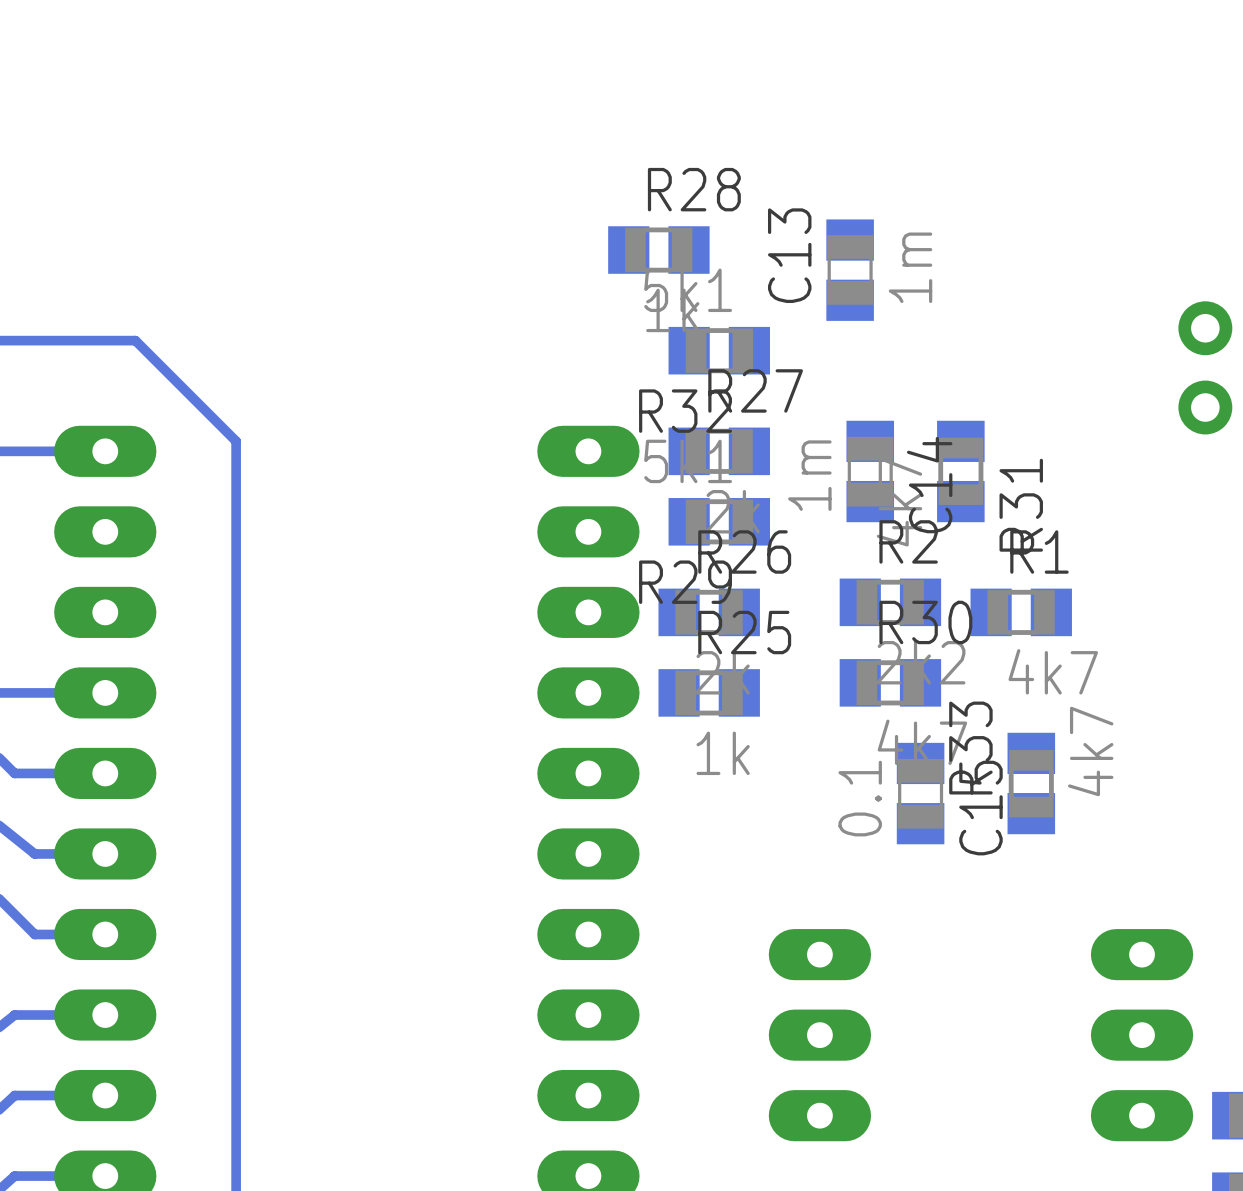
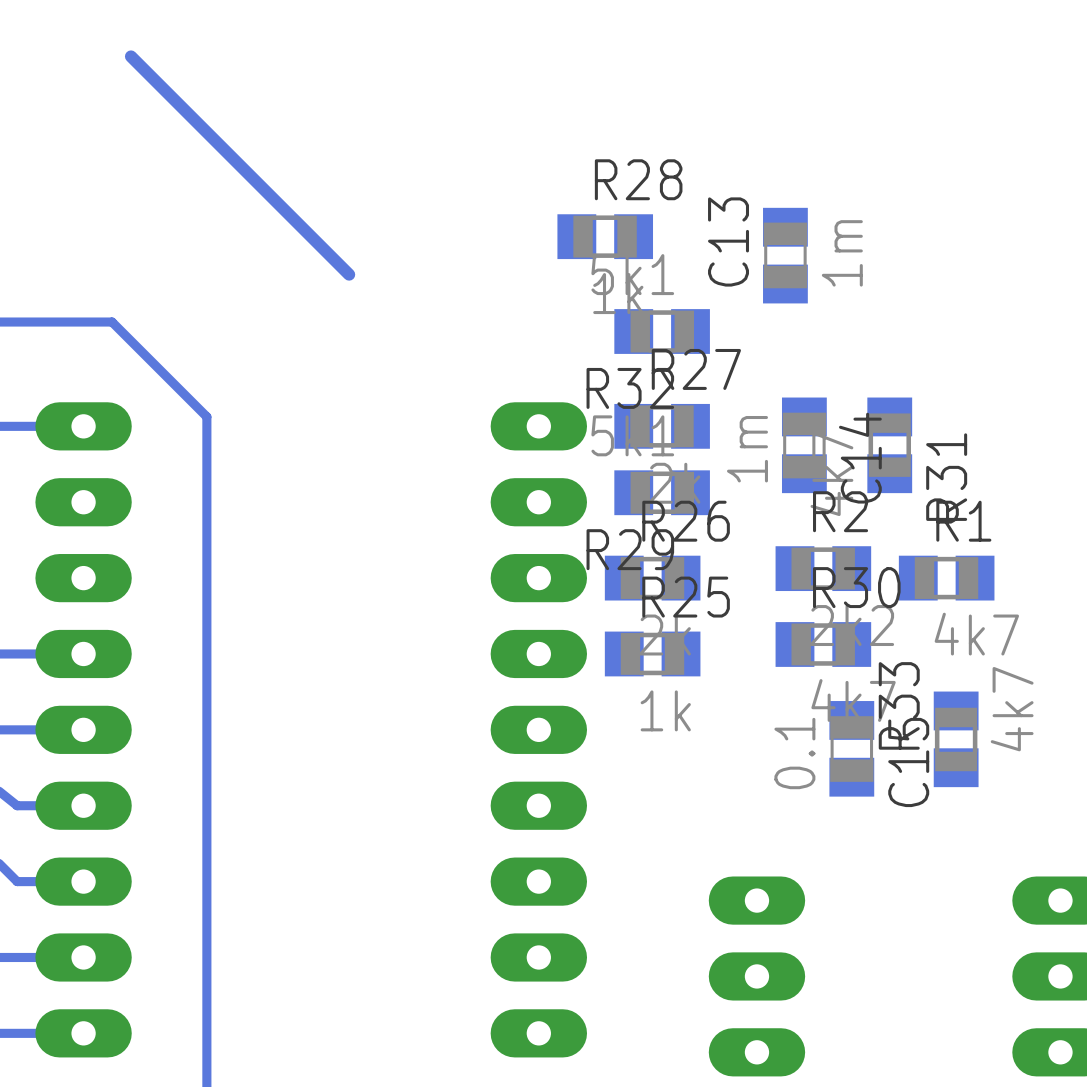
track: none -> (131, 56) (349, 274)

